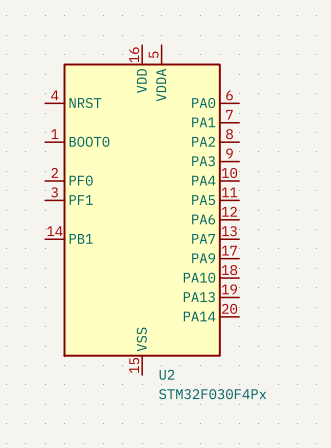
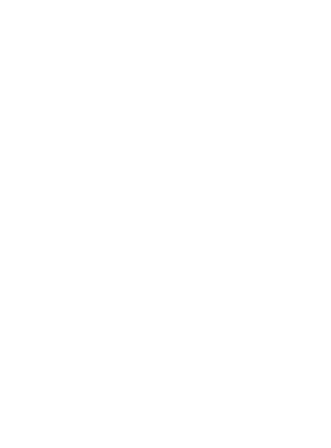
U2: STM32F030F4Px (142, 210) -> none

